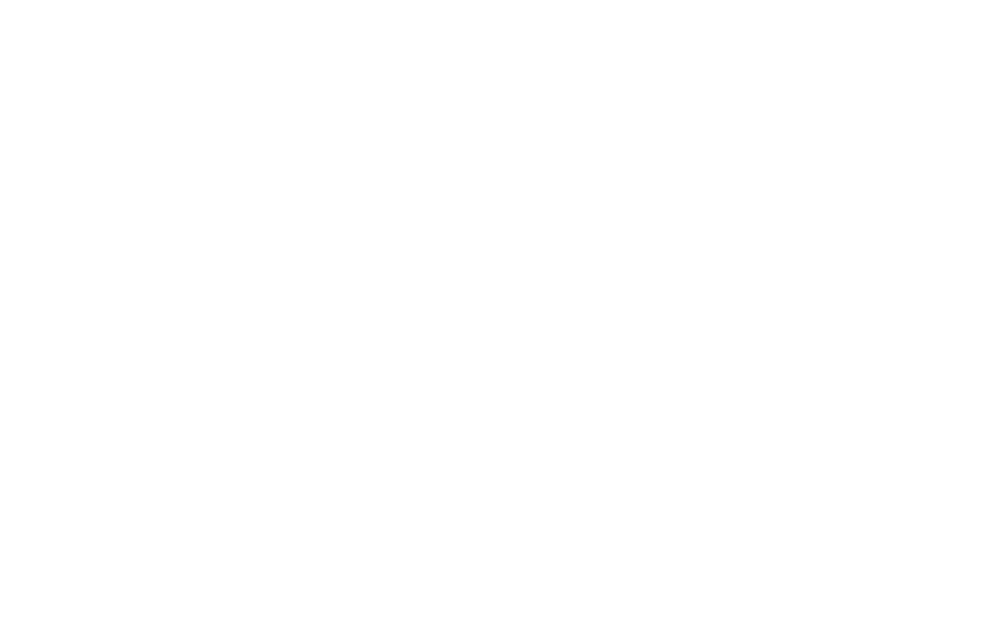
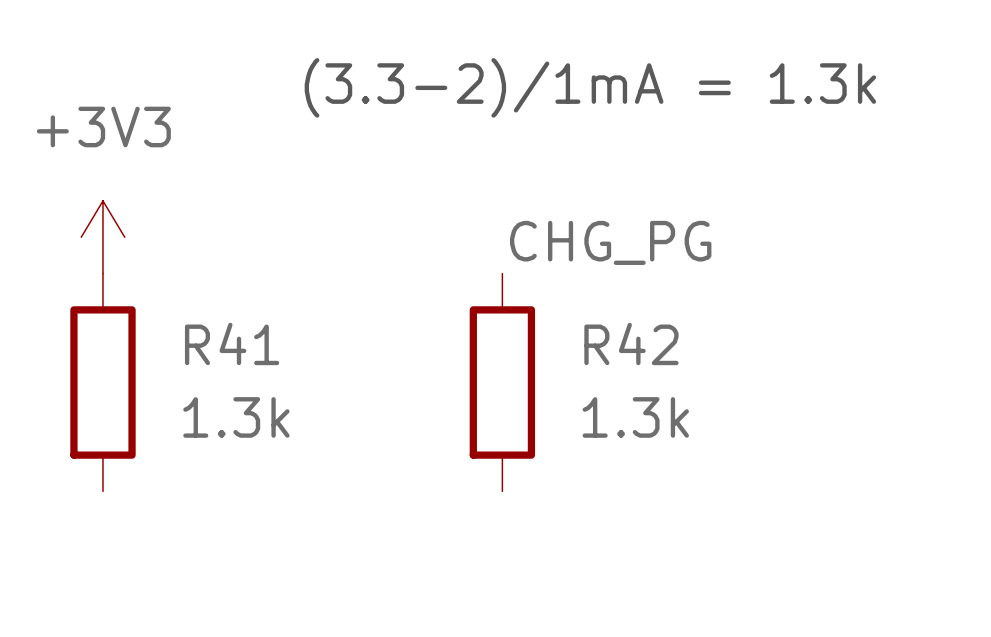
text: none -> (3.3-2)/1mA = 1.3k (590, 87)
power symbol: none -> +3V3 (102, 237)
label: none -> CHG_PG (610, 242)
R41: none -> 1.3k (102, 382)
R42: none -> 1.3k (502, 382)

